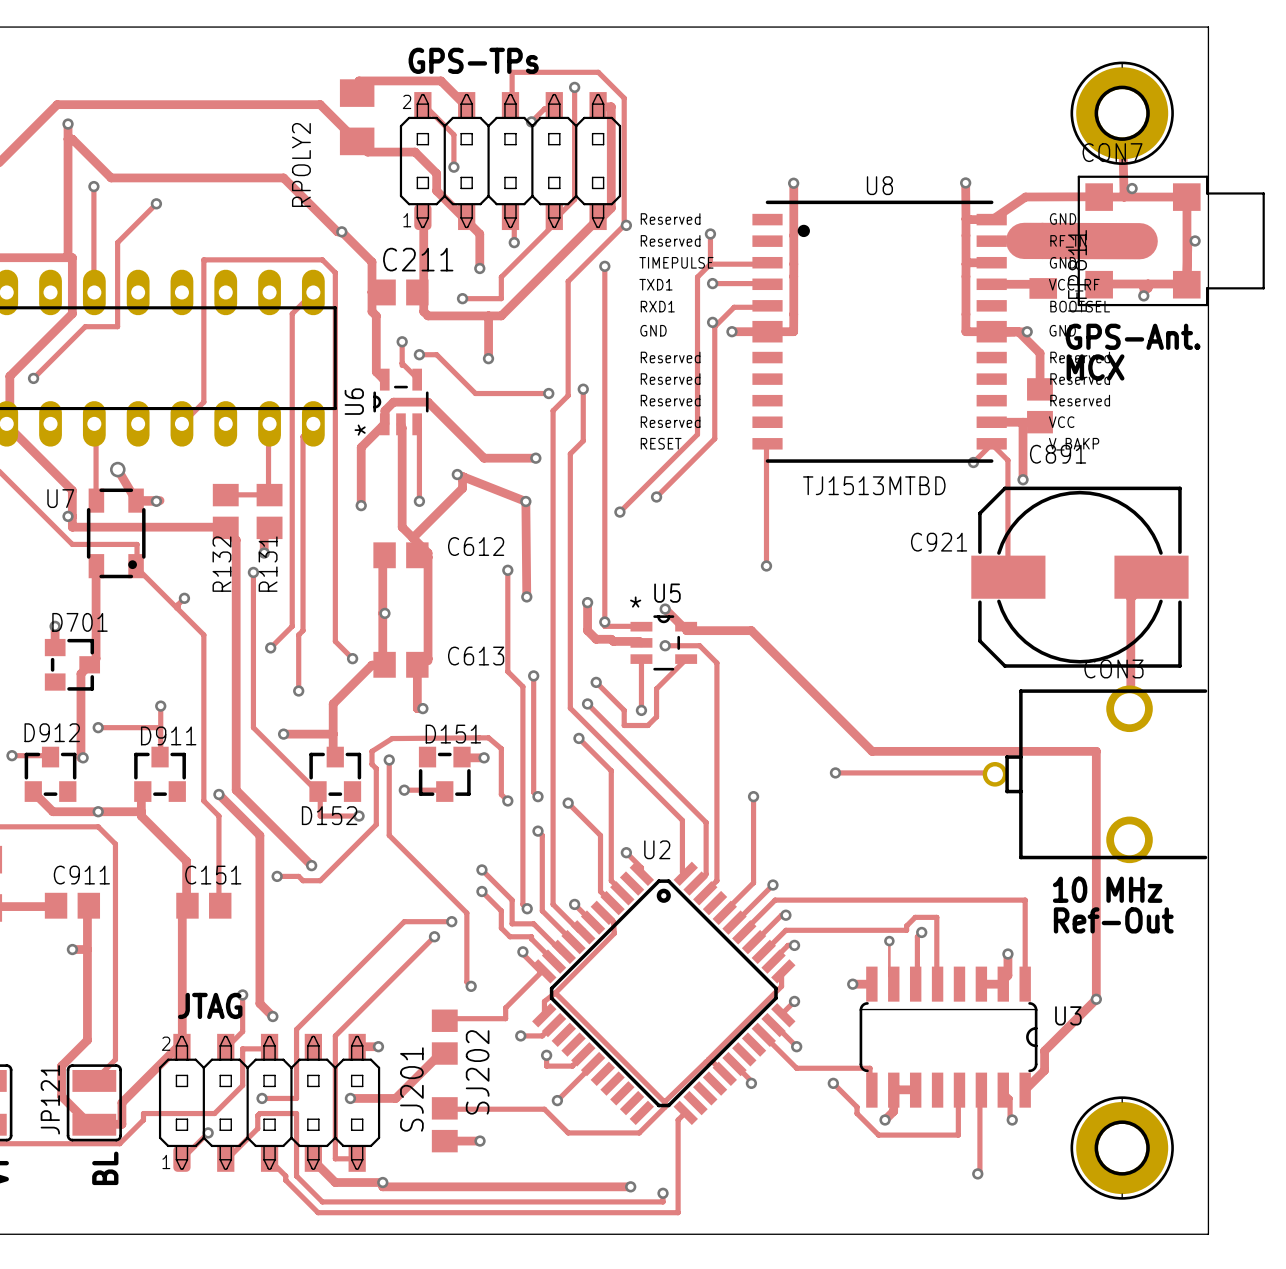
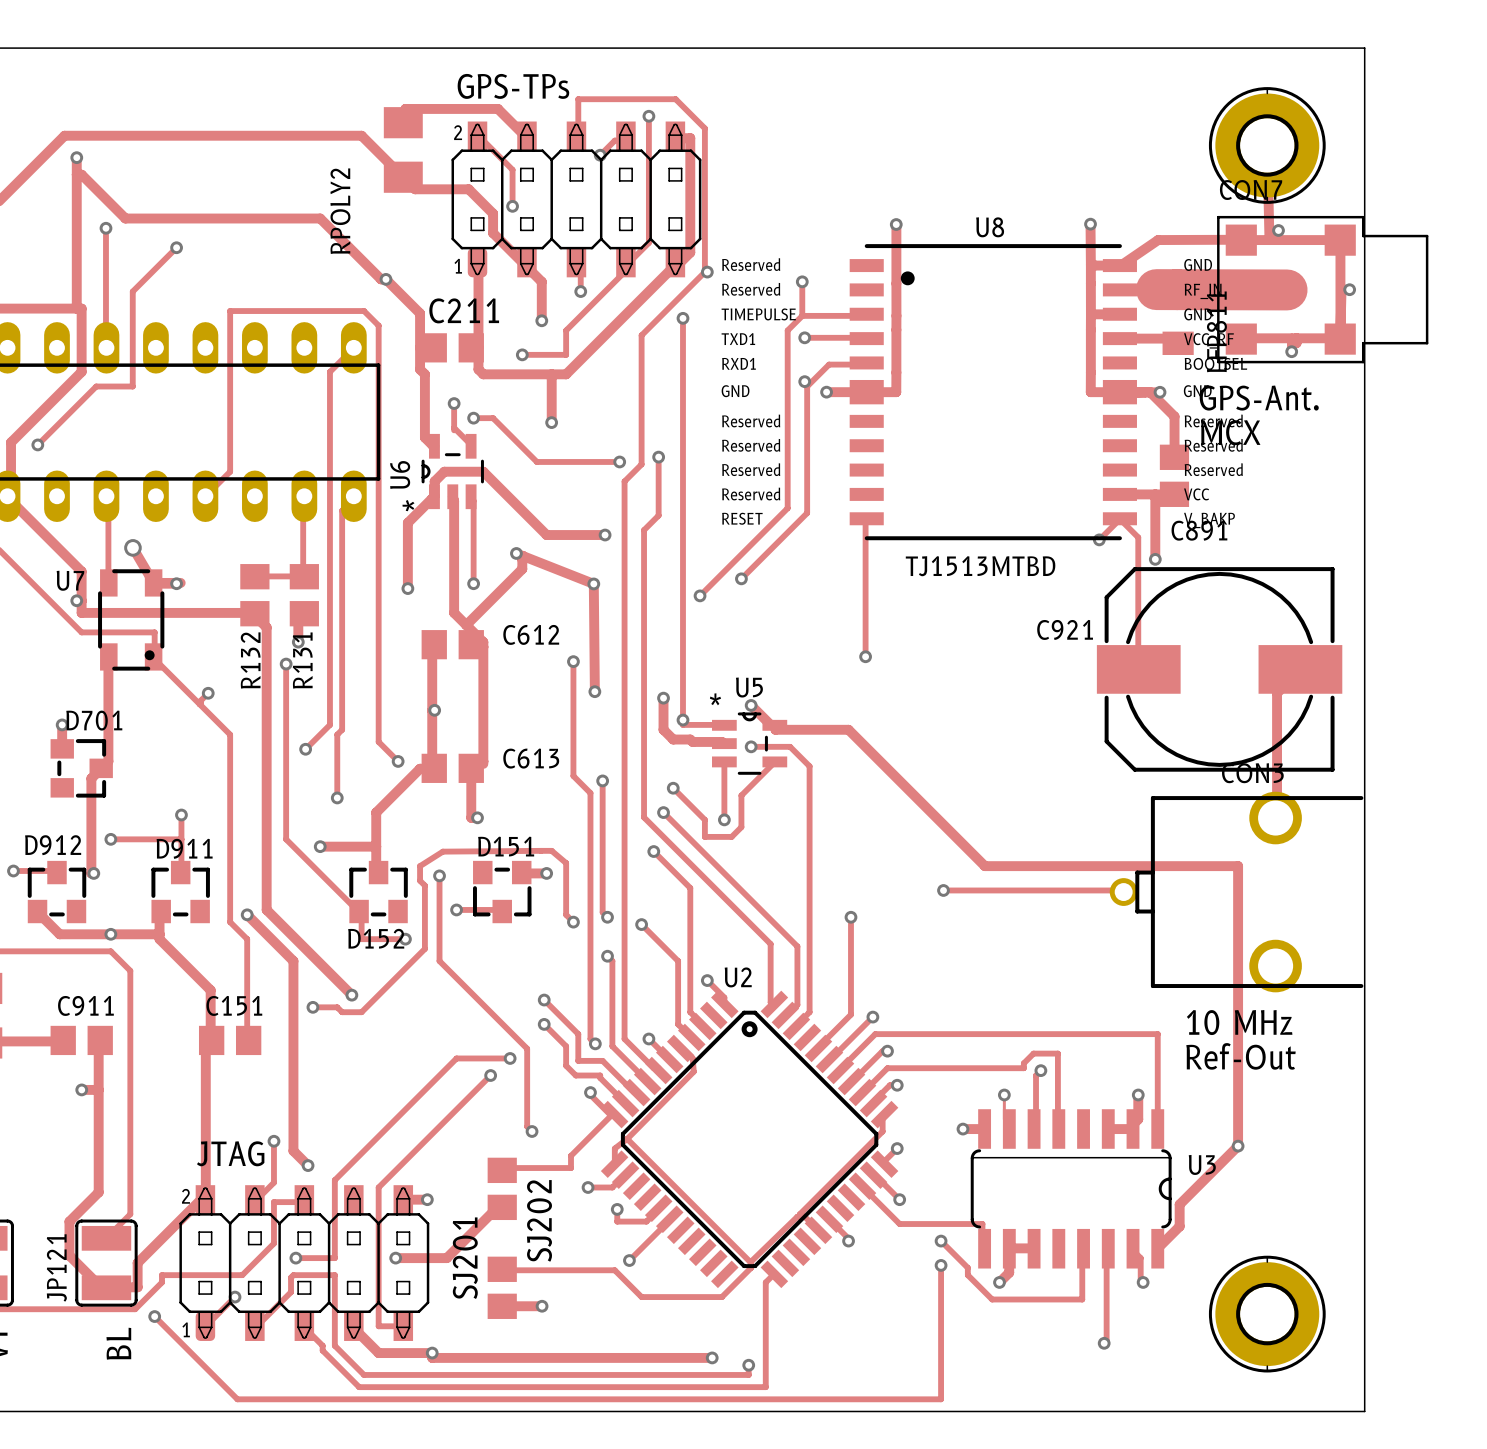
track: (889, 941) (889, 954) -> none
via: (889, 941) -> none
via: none -> (1004, 1094)
track: none -> (941, 1265) (941, 1399) (237, 1399) (154, 1316)
via: none -> (941, 1265)
via: none -> (154, 1316)

